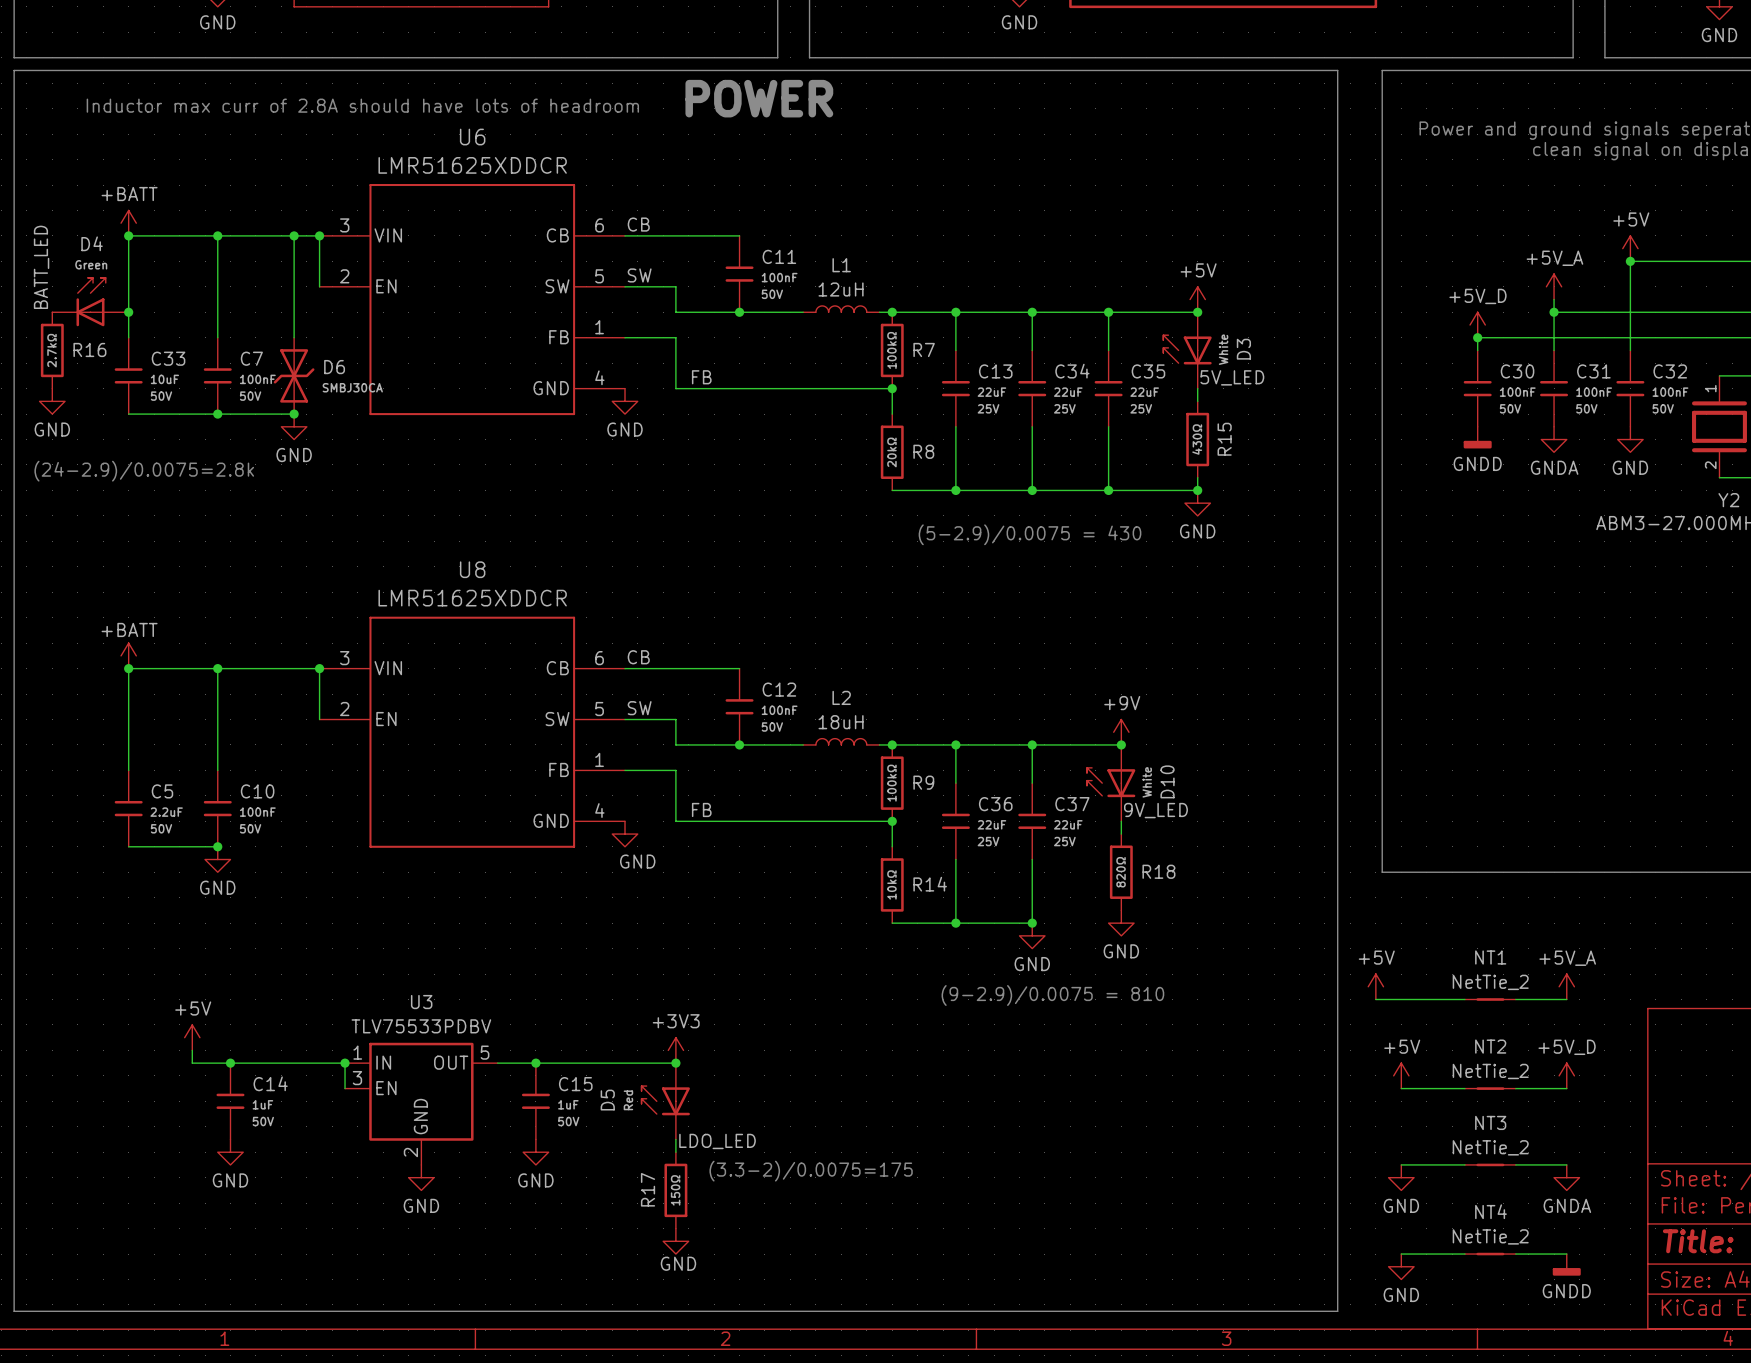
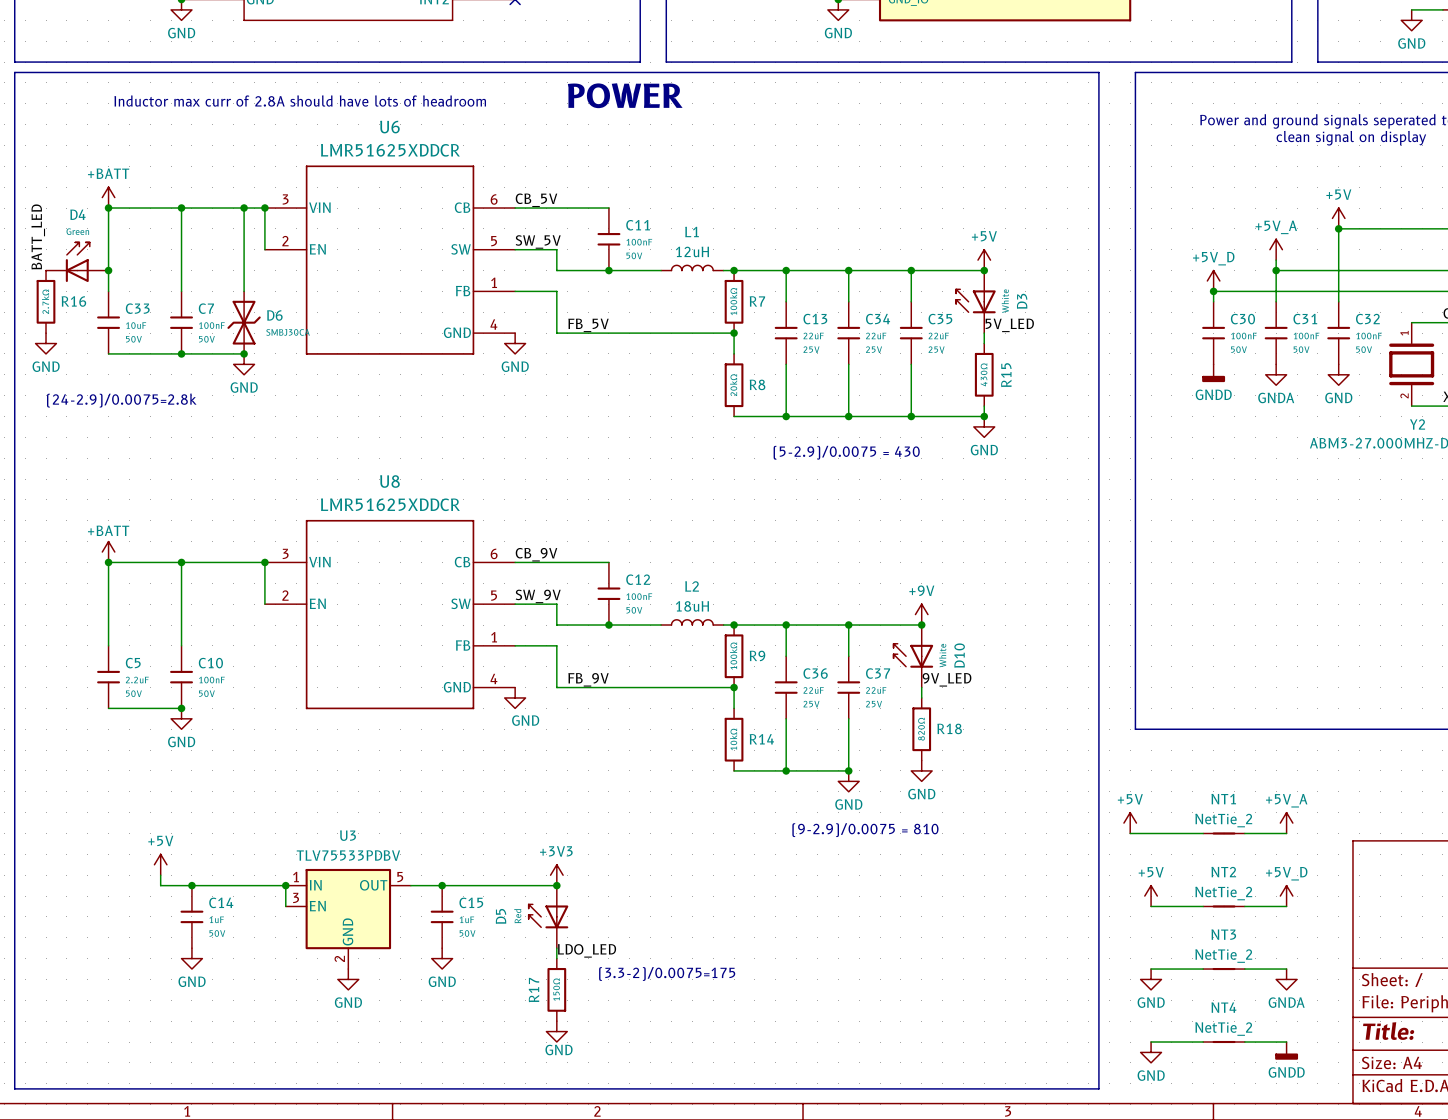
label: CB (638, 224) -> CB_5V (536, 200)
label: SW (639, 275) -> SW_5V (538, 241)
label: FB (701, 377) -> FB_5V (588, 325)
label: CB (638, 657) -> CB_9V (536, 554)
label: SW (639, 708) -> SW_9V (538, 596)
label: FB (701, 809) -> FB_9V (588, 679)

